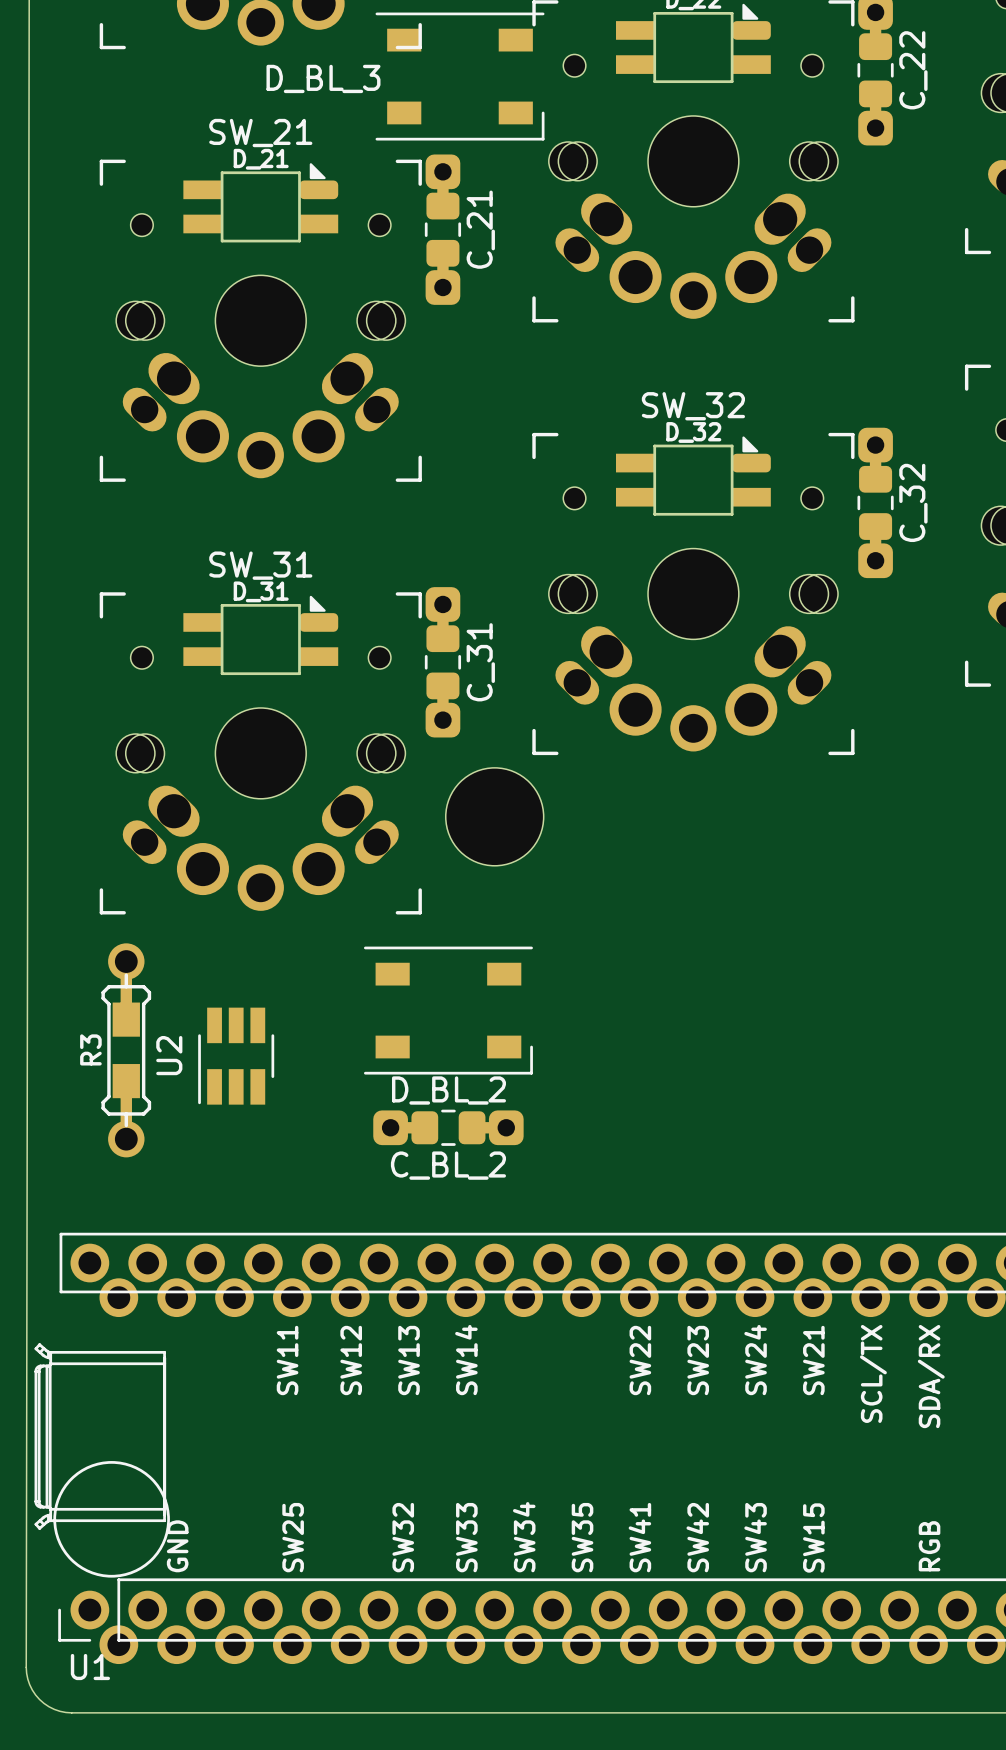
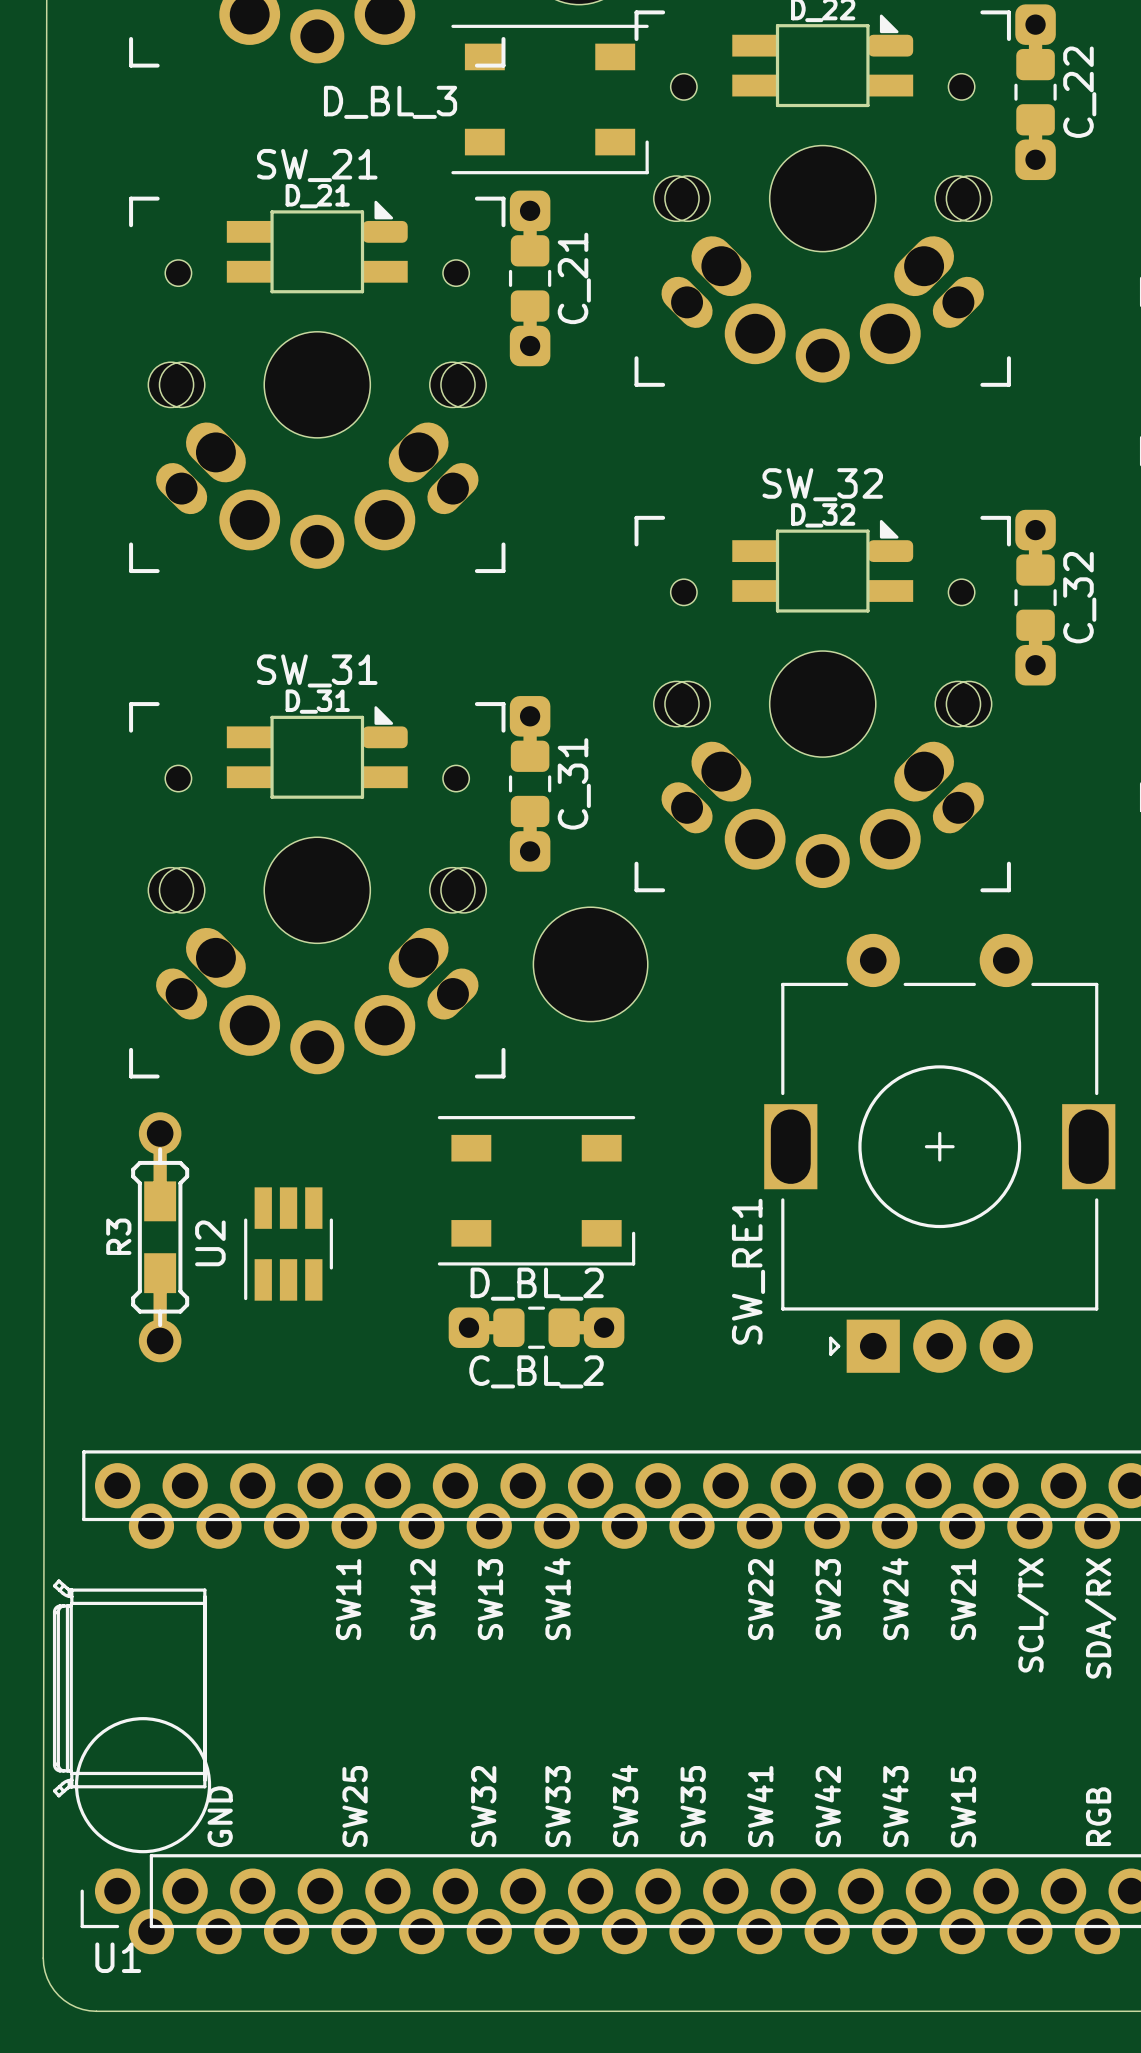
SW_RE1: none -> (939, 1153)

